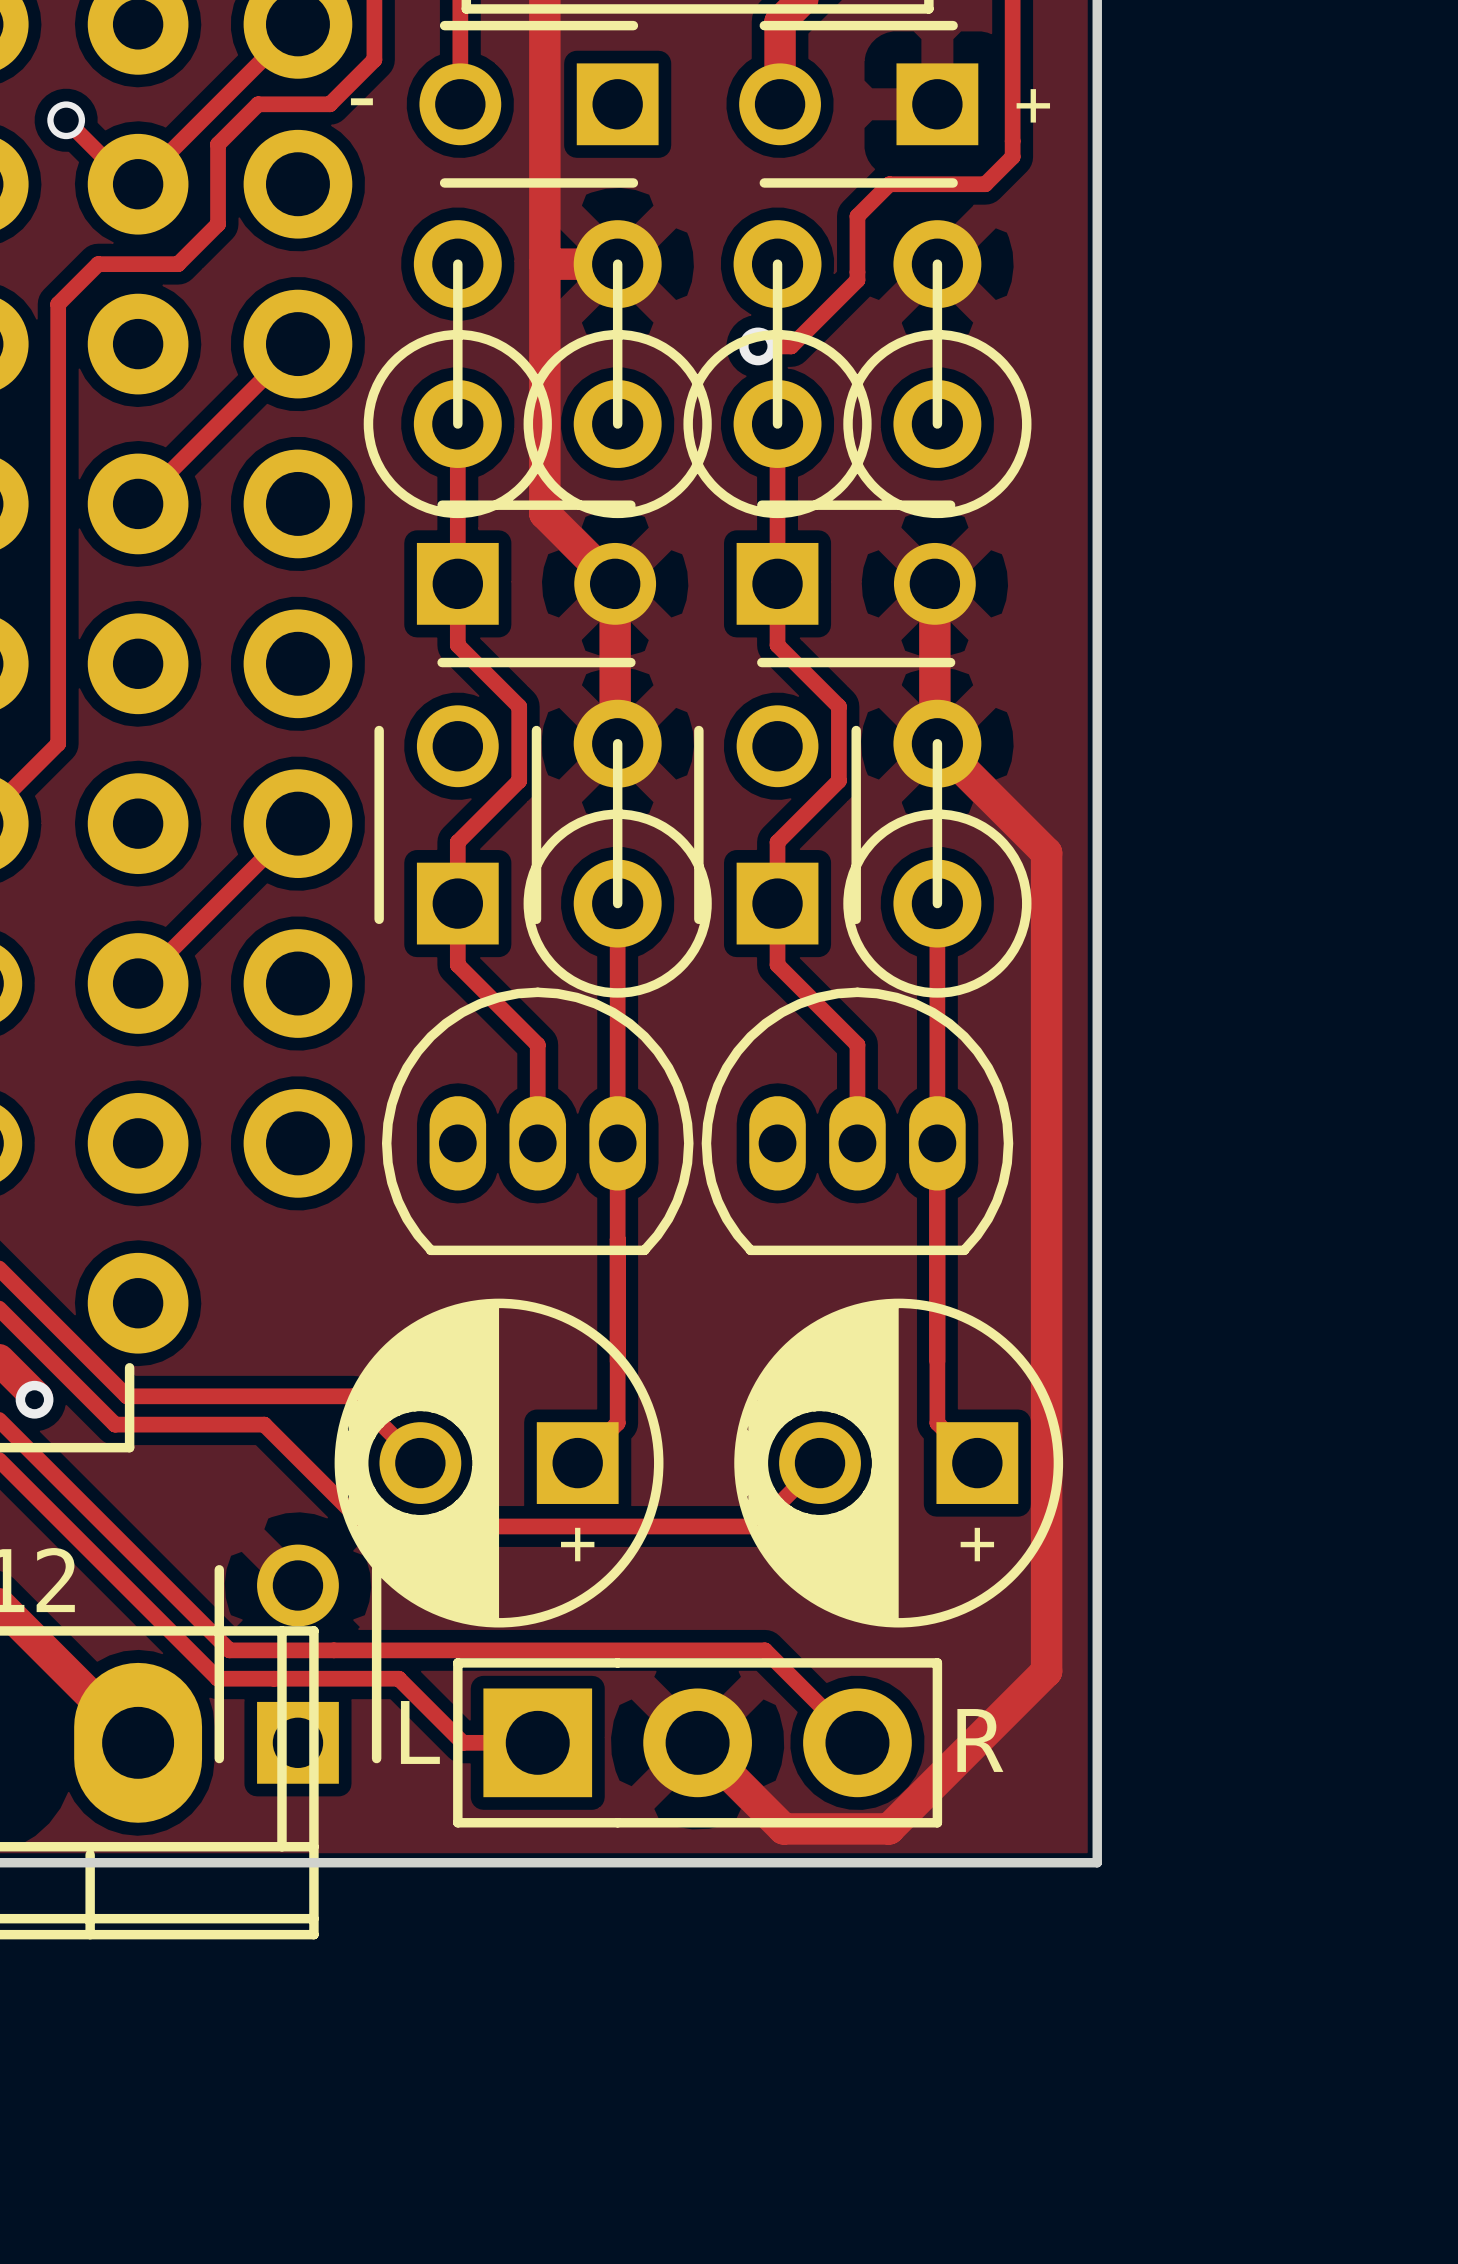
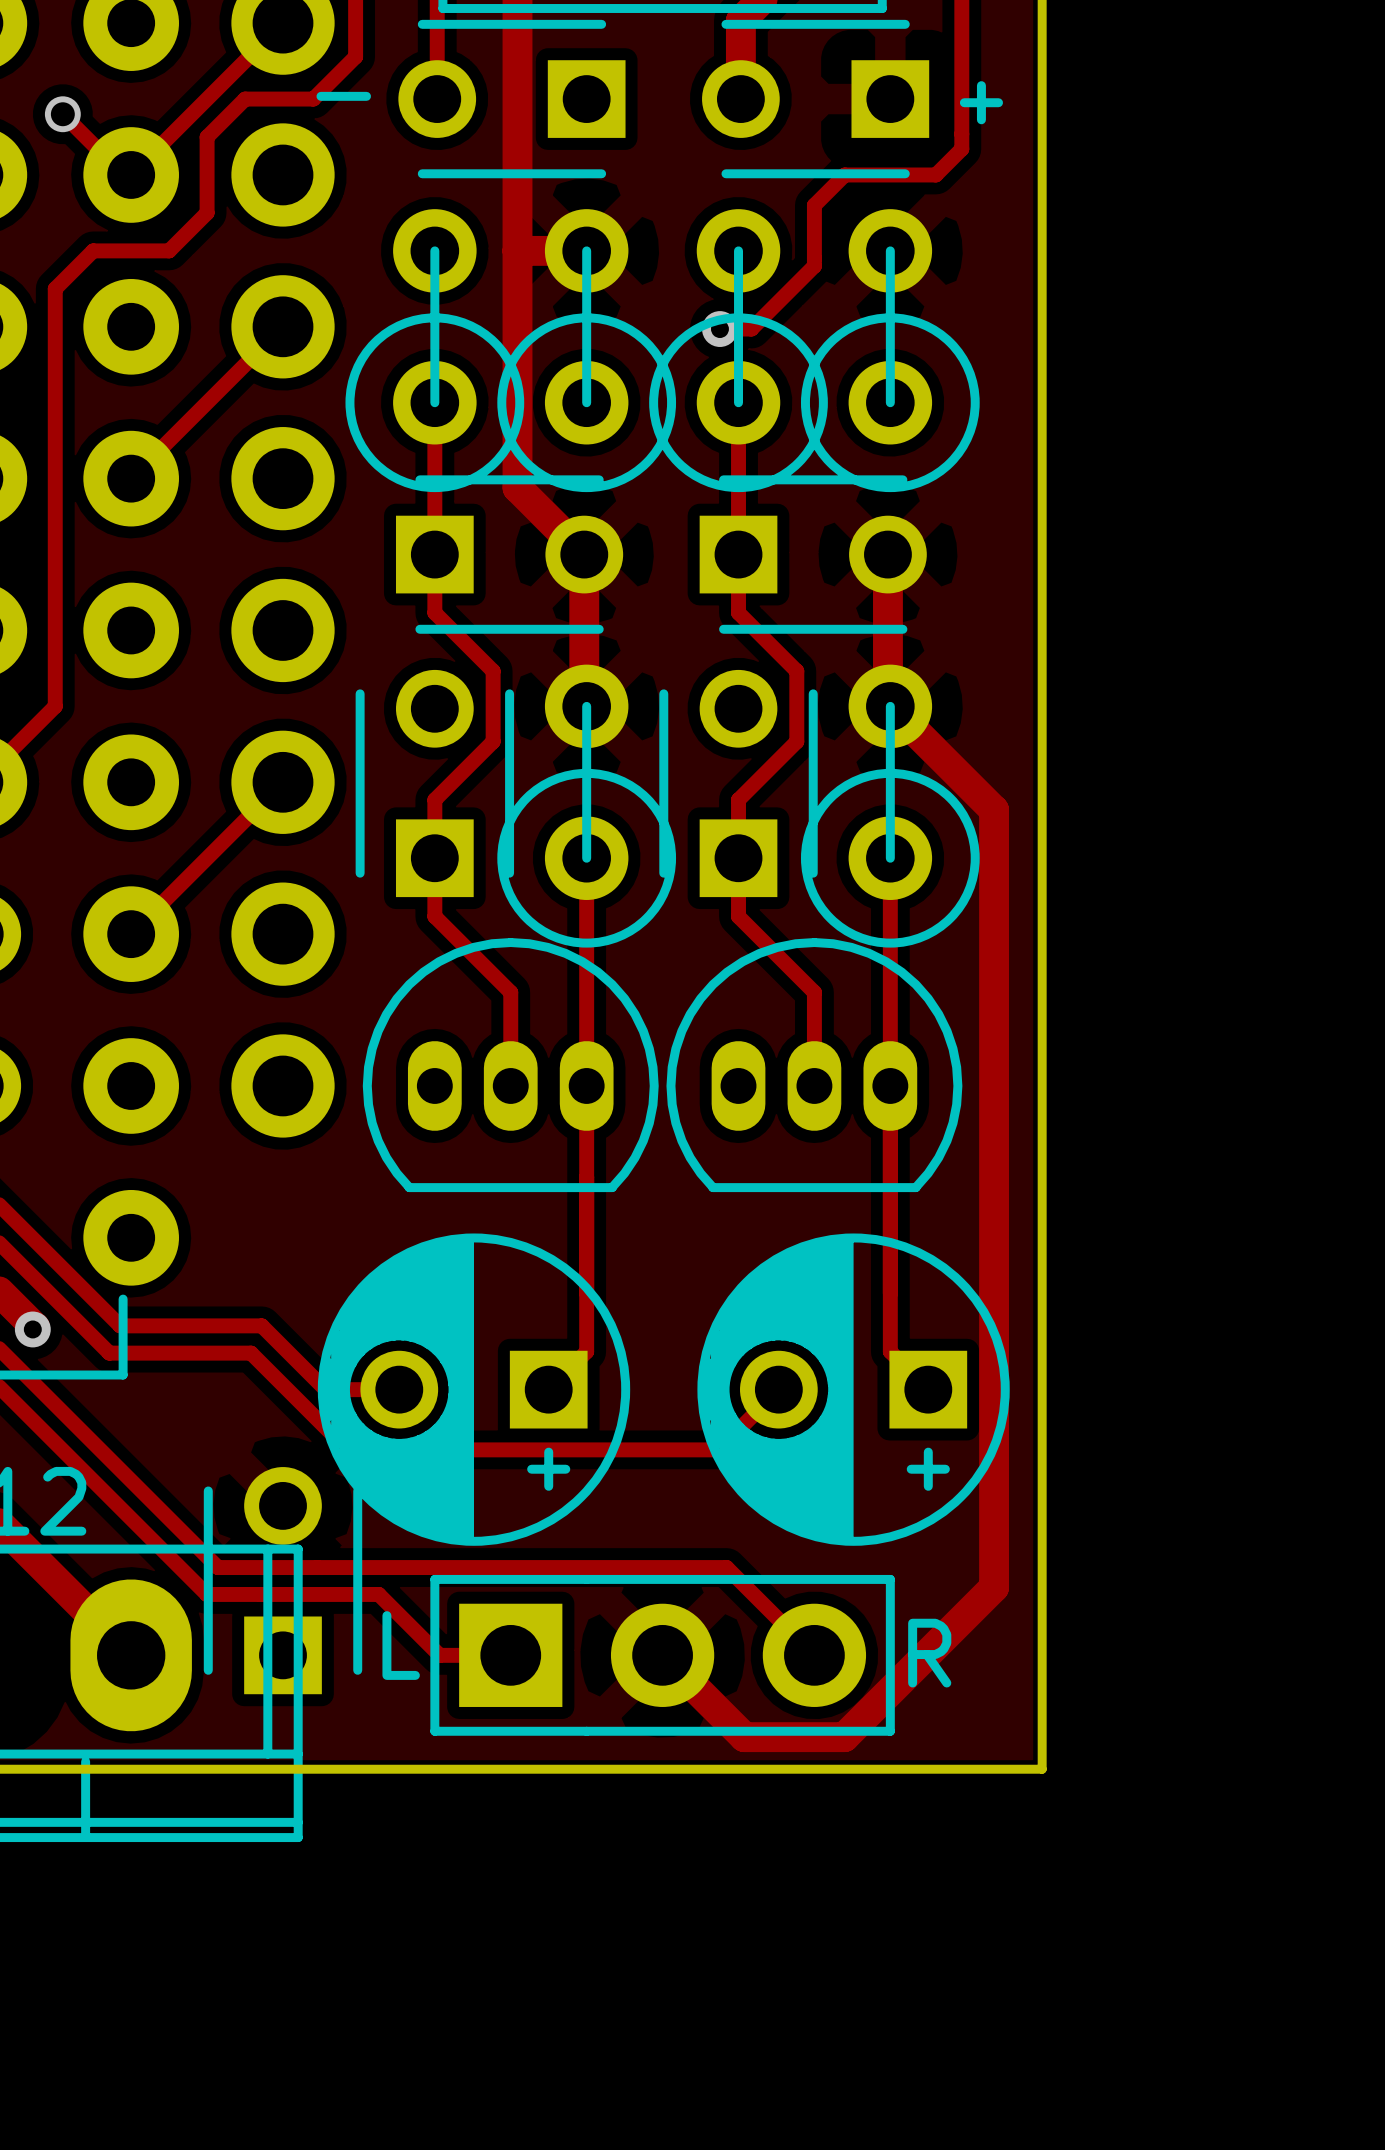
track: (126, 1396) (353, 1396) (420, 1463) -> (120, 1325) (261, 1325) (325, 1389) (399, 1389)

